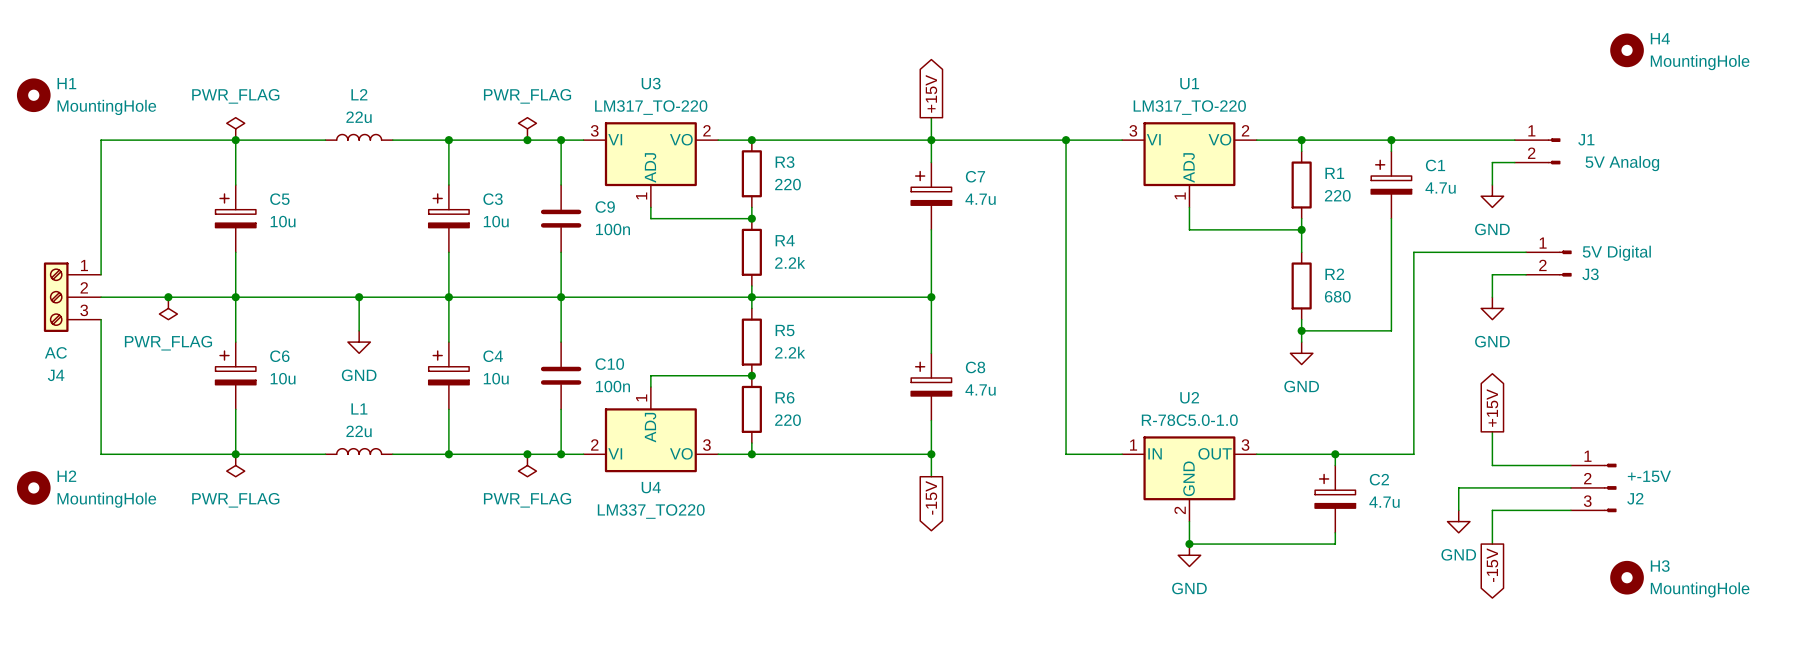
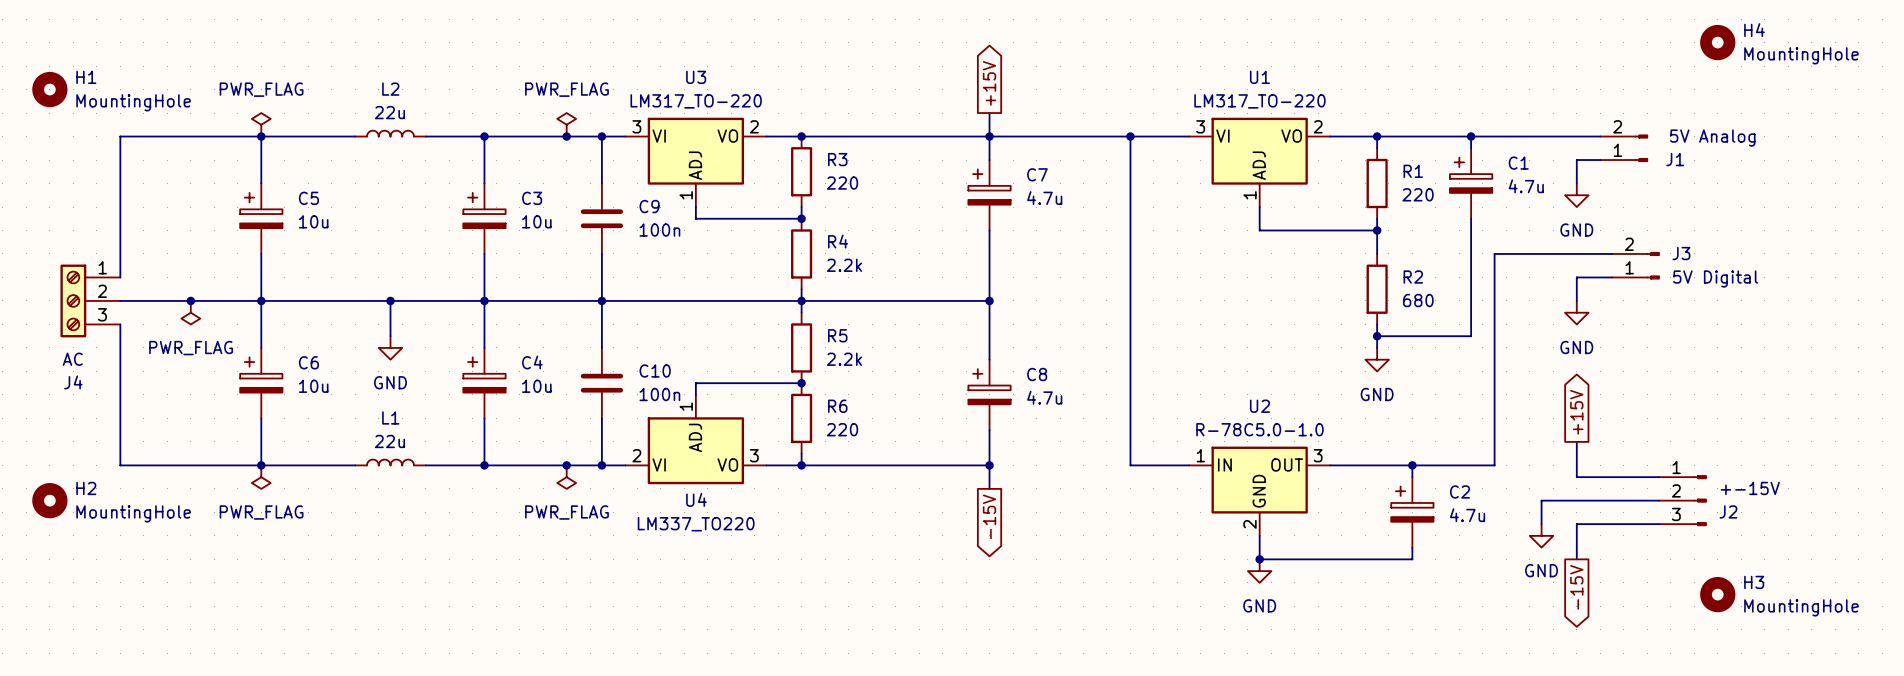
J1 flip: as is (1554, 151) -> up-down (1641, 148)
J3 flip: as is (1565, 263) -> up-down (1653, 265)

